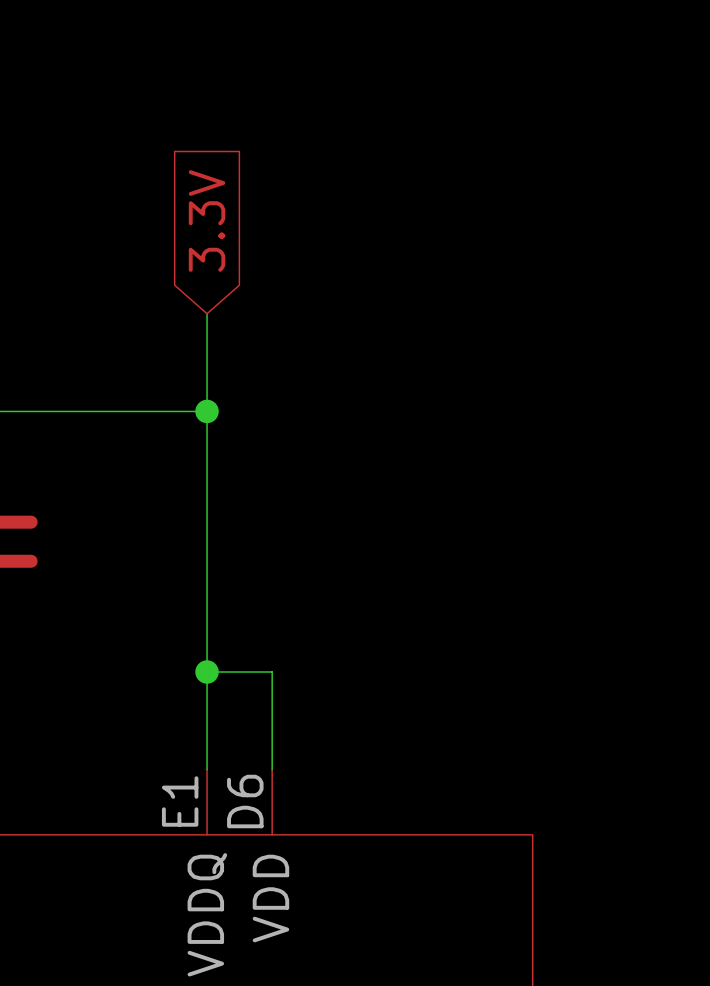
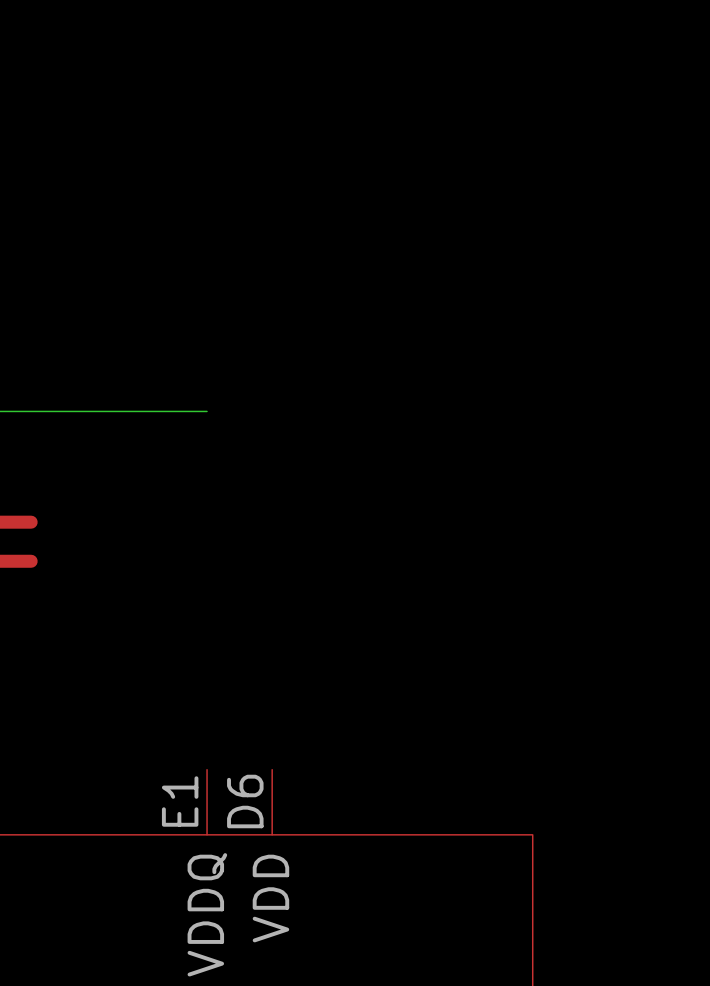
global label: 3.3V (207, 221) -> none
wire: (207, 313) (207, 769) -> none
junction: (207, 411) -> none
wire: (207, 672) (272, 672) (272, 769) -> none
junction: (207, 672) -> none

